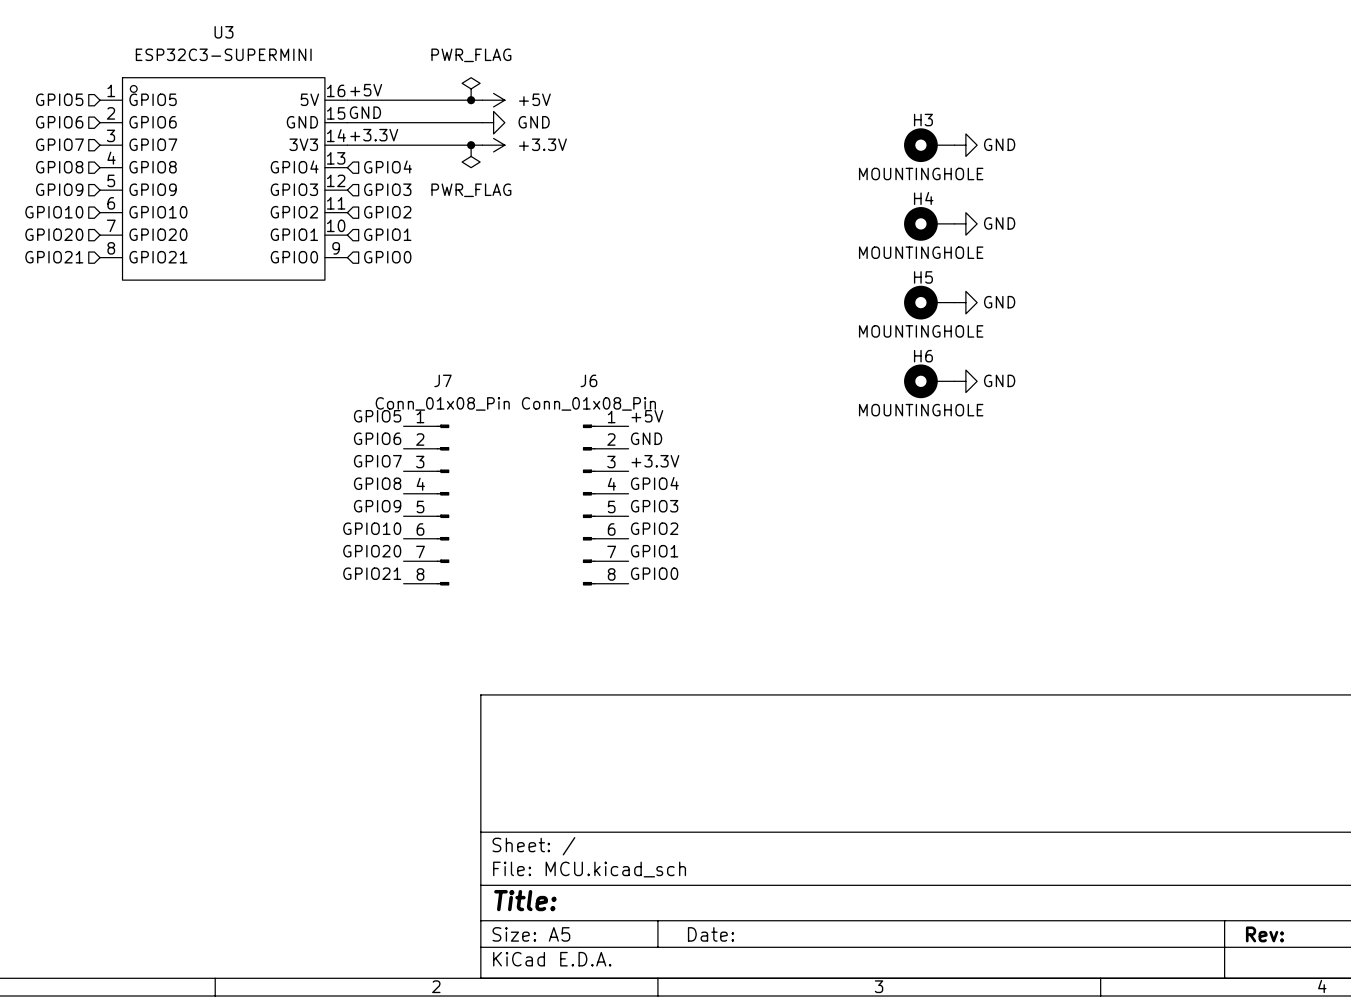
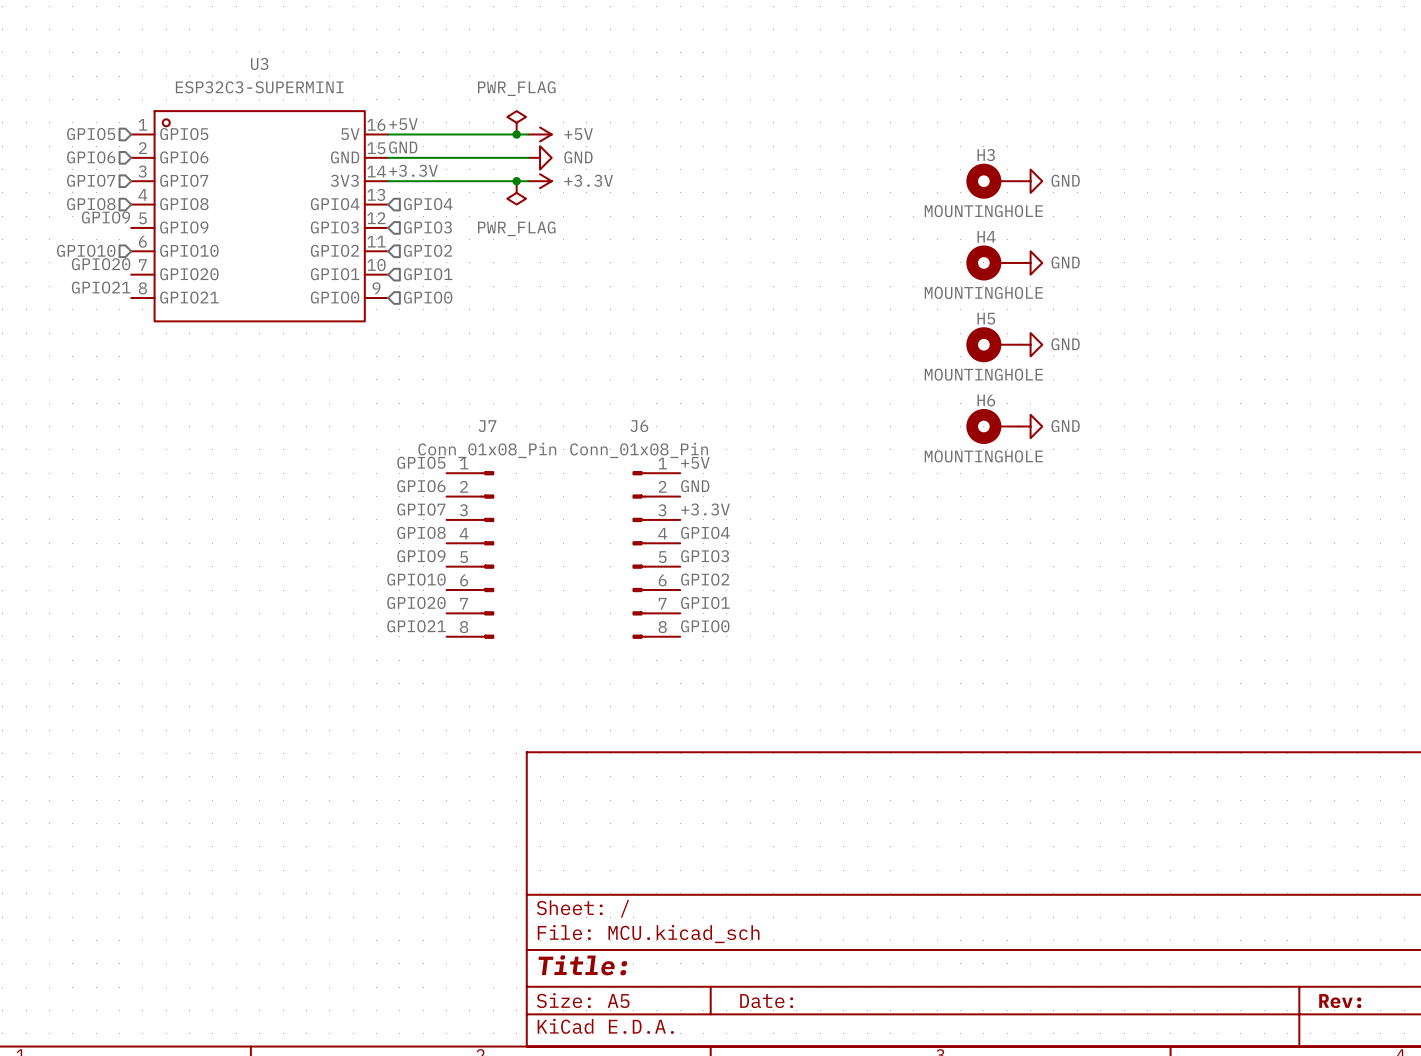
label: none -> GPIO9 (106, 217)
hierarchical label: GPIO9 (59, 189) -> none
label: none -> GPIO20 (101, 264)
hierarchical label: GPIO20 (54, 234) -> none
label: none -> GPIO21 (101, 287)
hierarchical label: GPIO21 (54, 257) -> none

